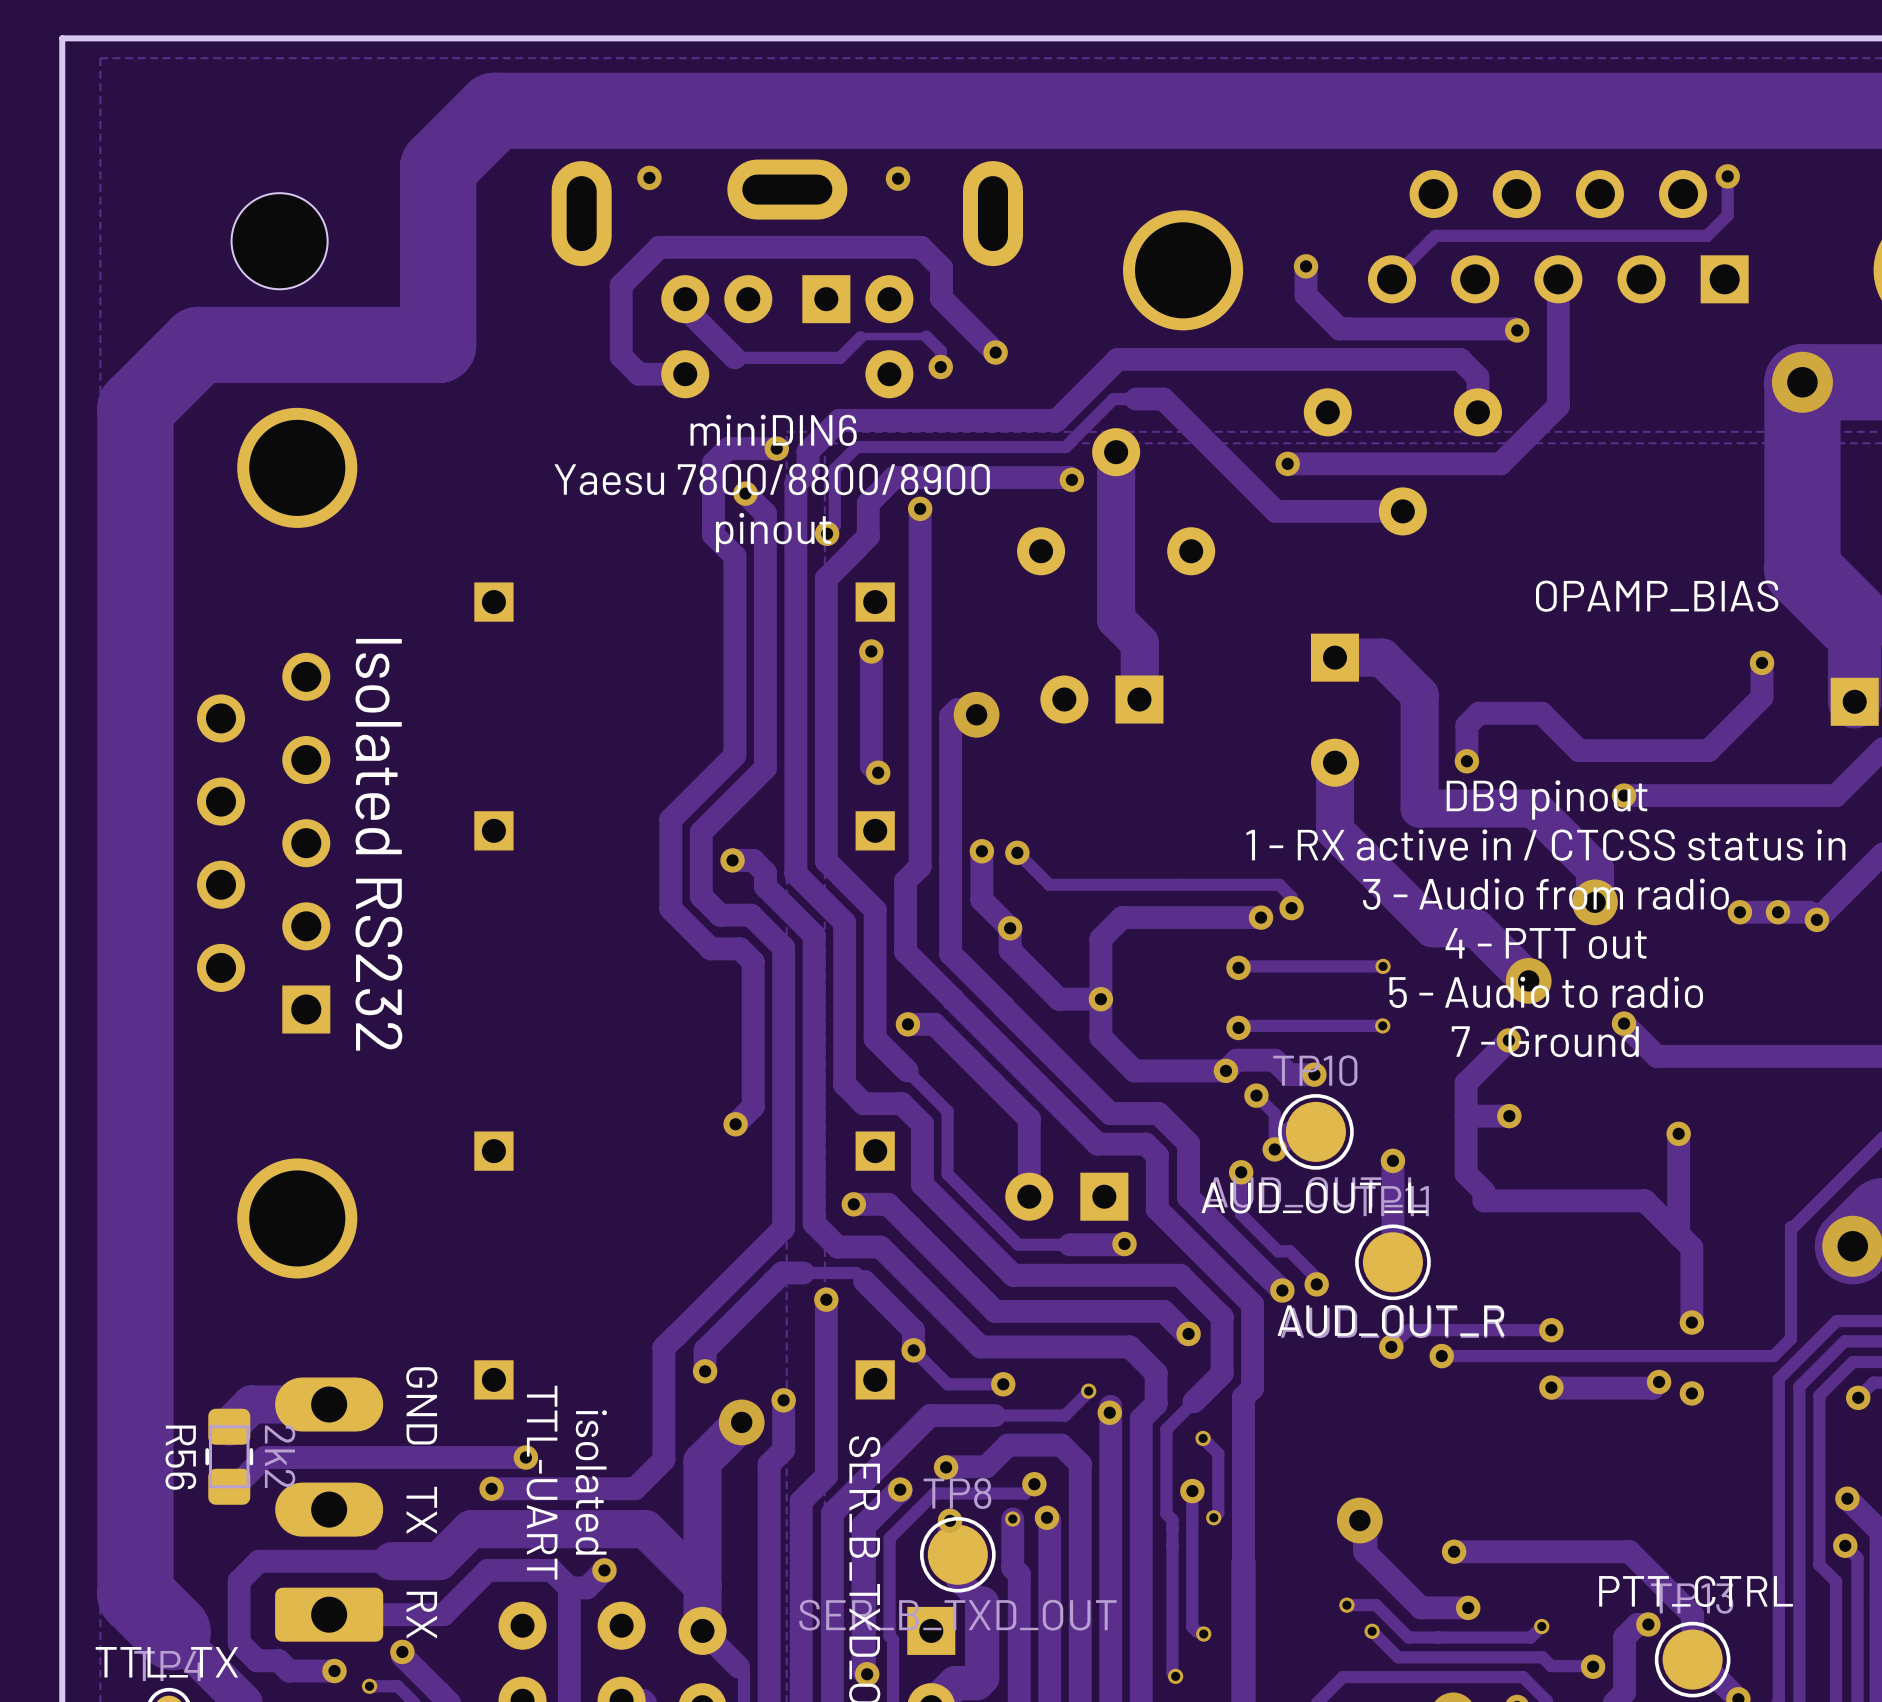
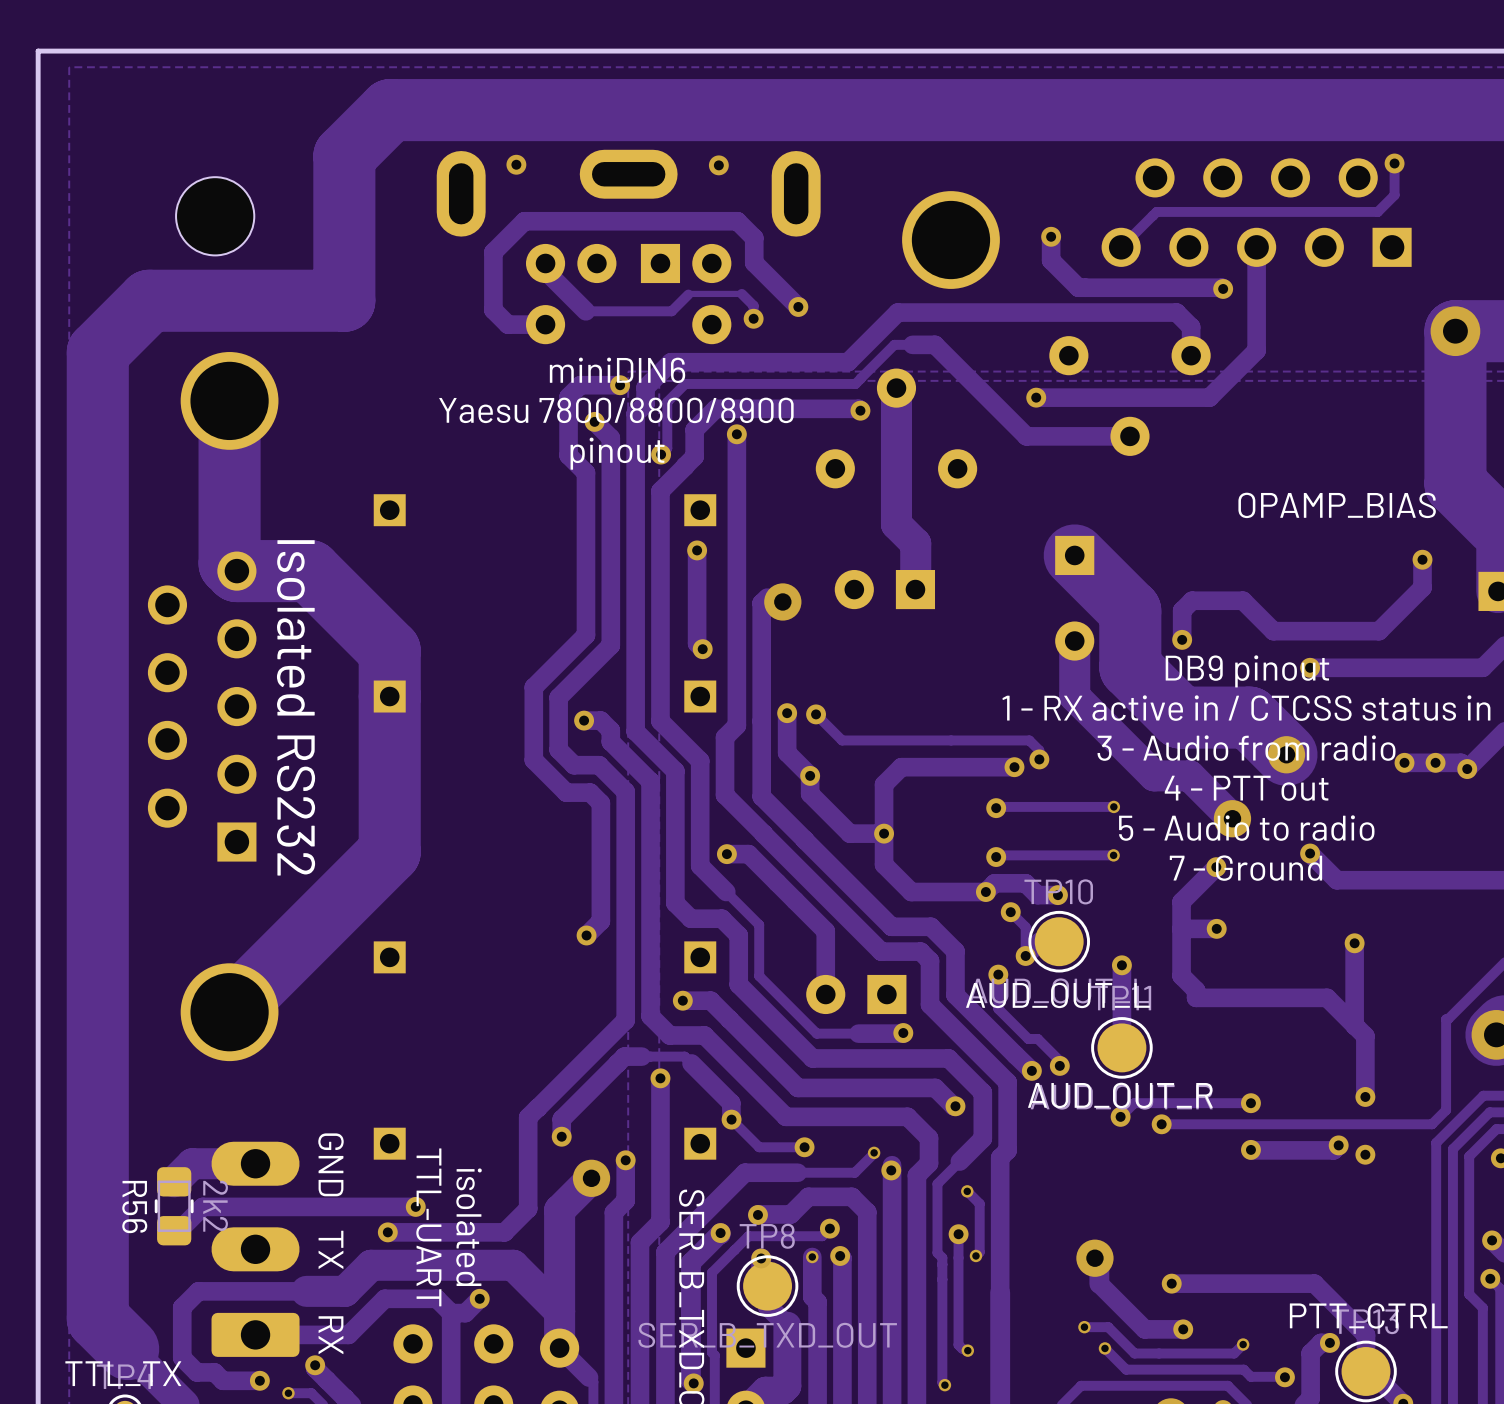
track: none -> (229, 400) (229, 563) (236, 571) (310, 571) (389, 650) (389, 852) (229, 1012)
track: (1334, 657) (1382, 657) (1419, 694) (1419, 808) (1534, 808) (1595, 869) (1595, 902) -> (1074, 555) (1130, 611) (1130, 667) (1180, 717) (1249, 717) (1286, 754)

